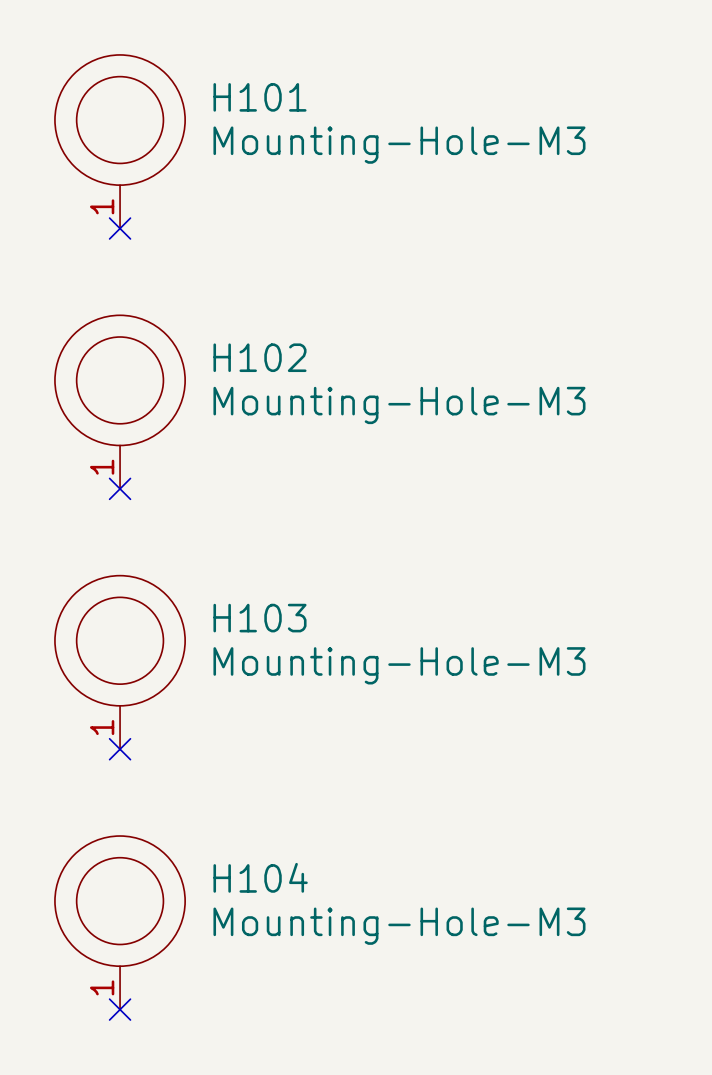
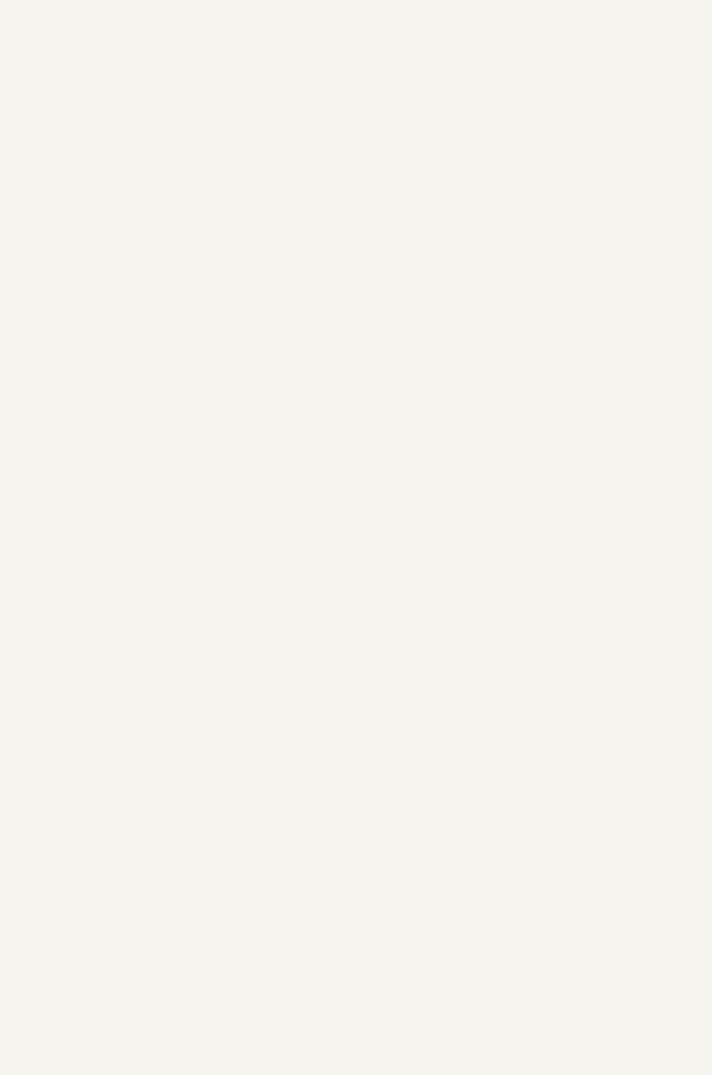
H101: Mounting-Hole-M3 (120, 141) -> none
no-connect mark: (120, 228) -> none
H102: Mounting-Hole-M3 (120, 402) -> none
no-connect mark: (120, 488) -> none
H103: Mounting-Hole-M3 (120, 662) -> none
no-connect mark: (120, 749) -> none
H104: Mounting-Hole-M3 (120, 922) -> none
no-connect mark: (120, 1009) -> none

